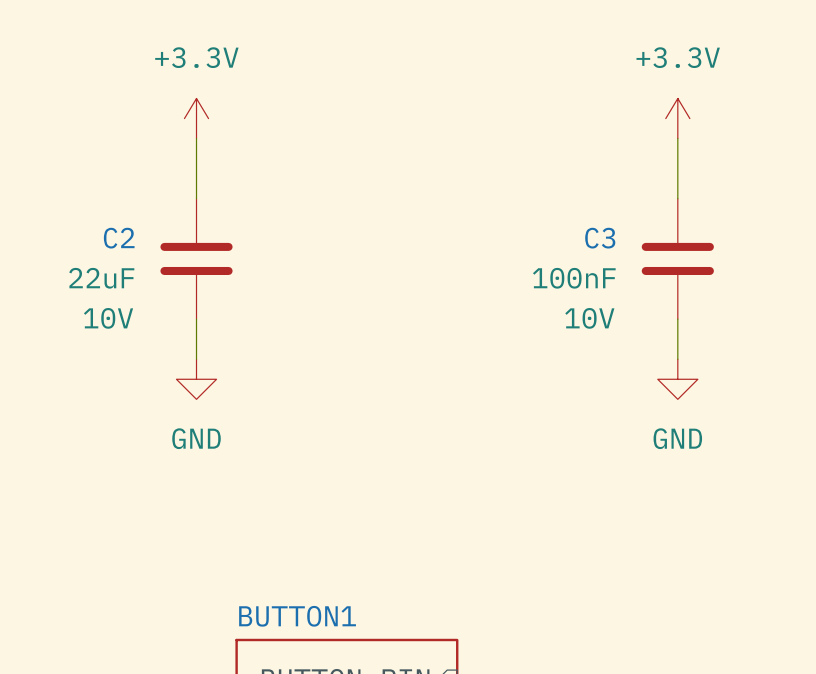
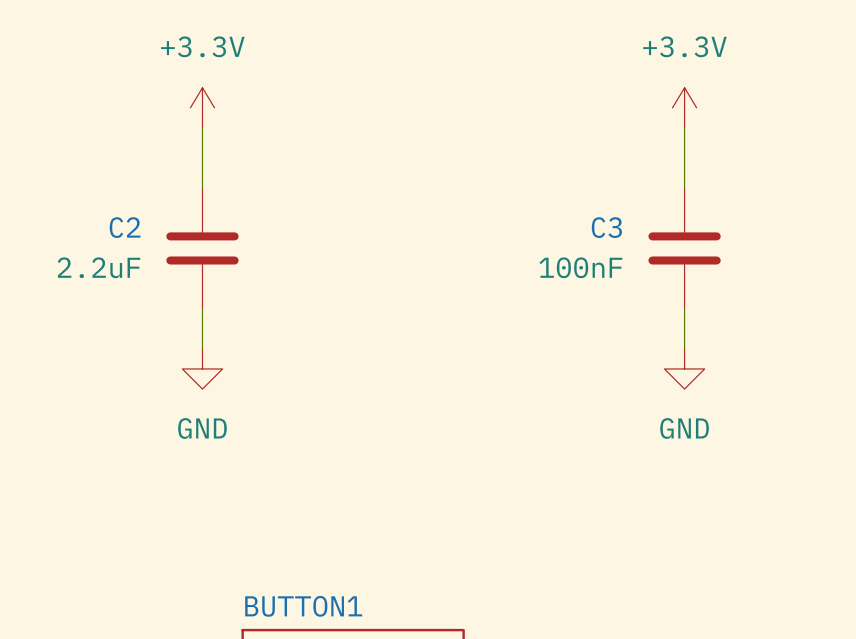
C2 value: 22uF (101, 278) -> 2.2uF (98, 267)
C2 text: 10V (108, 318) -> none
C3 text: 10V (589, 318) -> none

